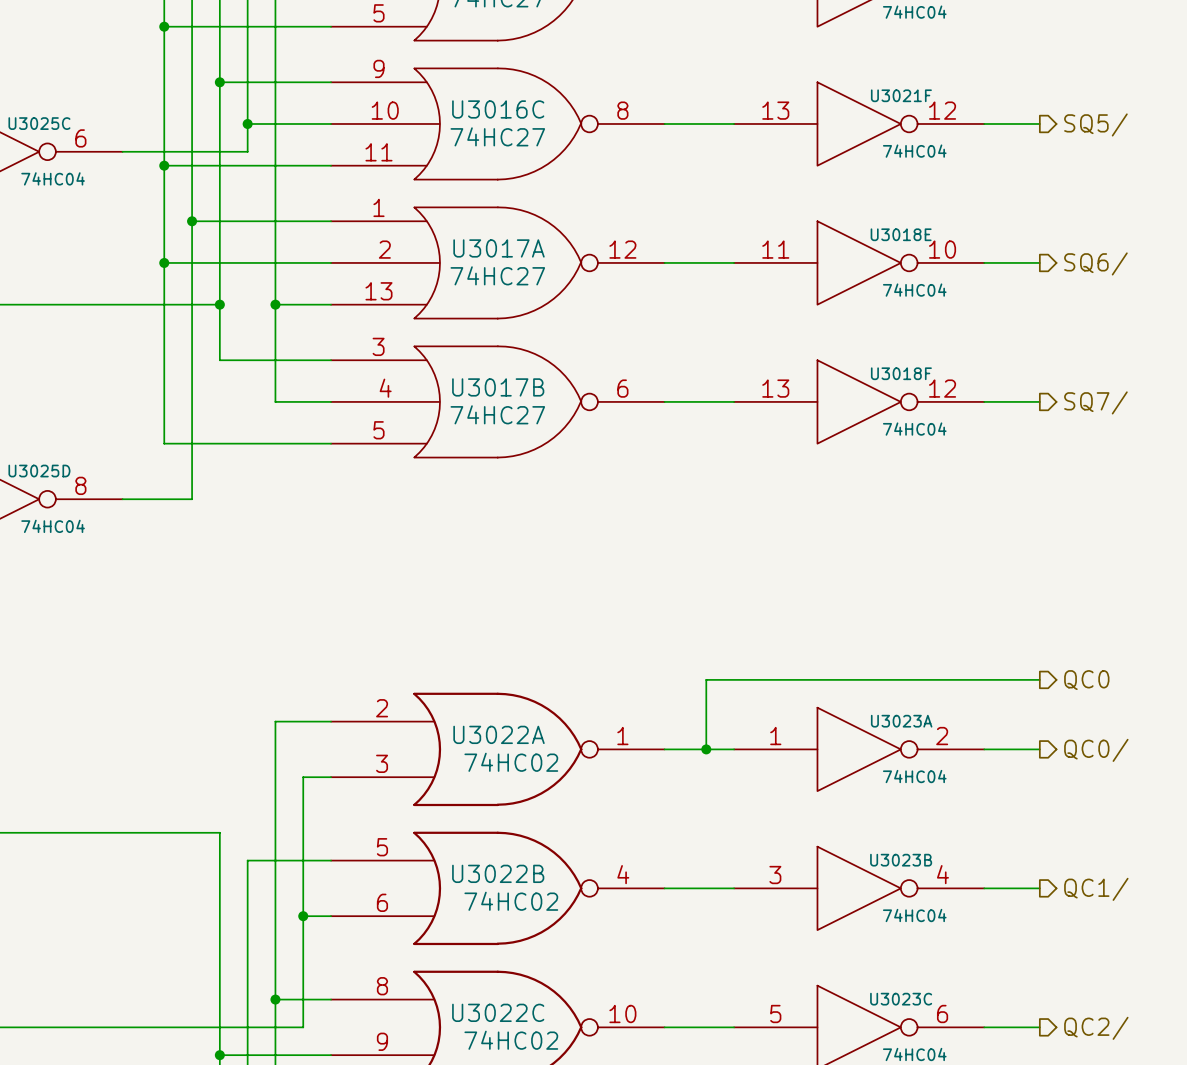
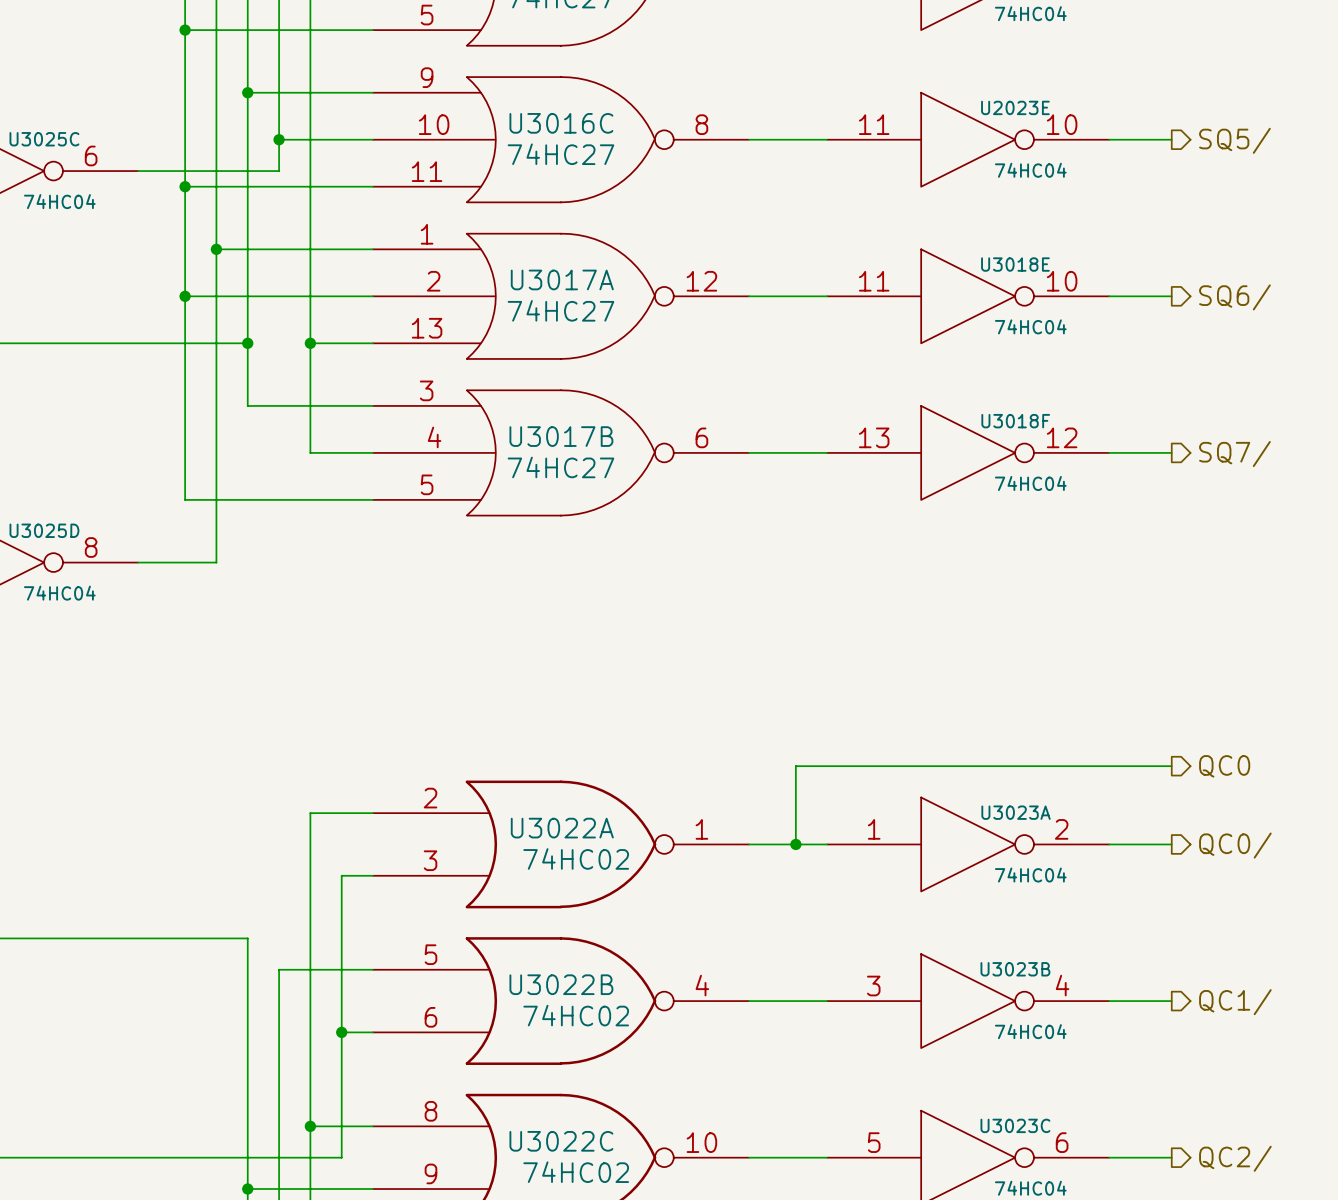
U3021F name: U3021F (901, 95) -> U2023E (1015, 107)
U3021F pin number: 13 (775, 110) -> 11 (874, 124)
U3021F pin number: 12 (942, 110) -> 10 (1062, 124)

